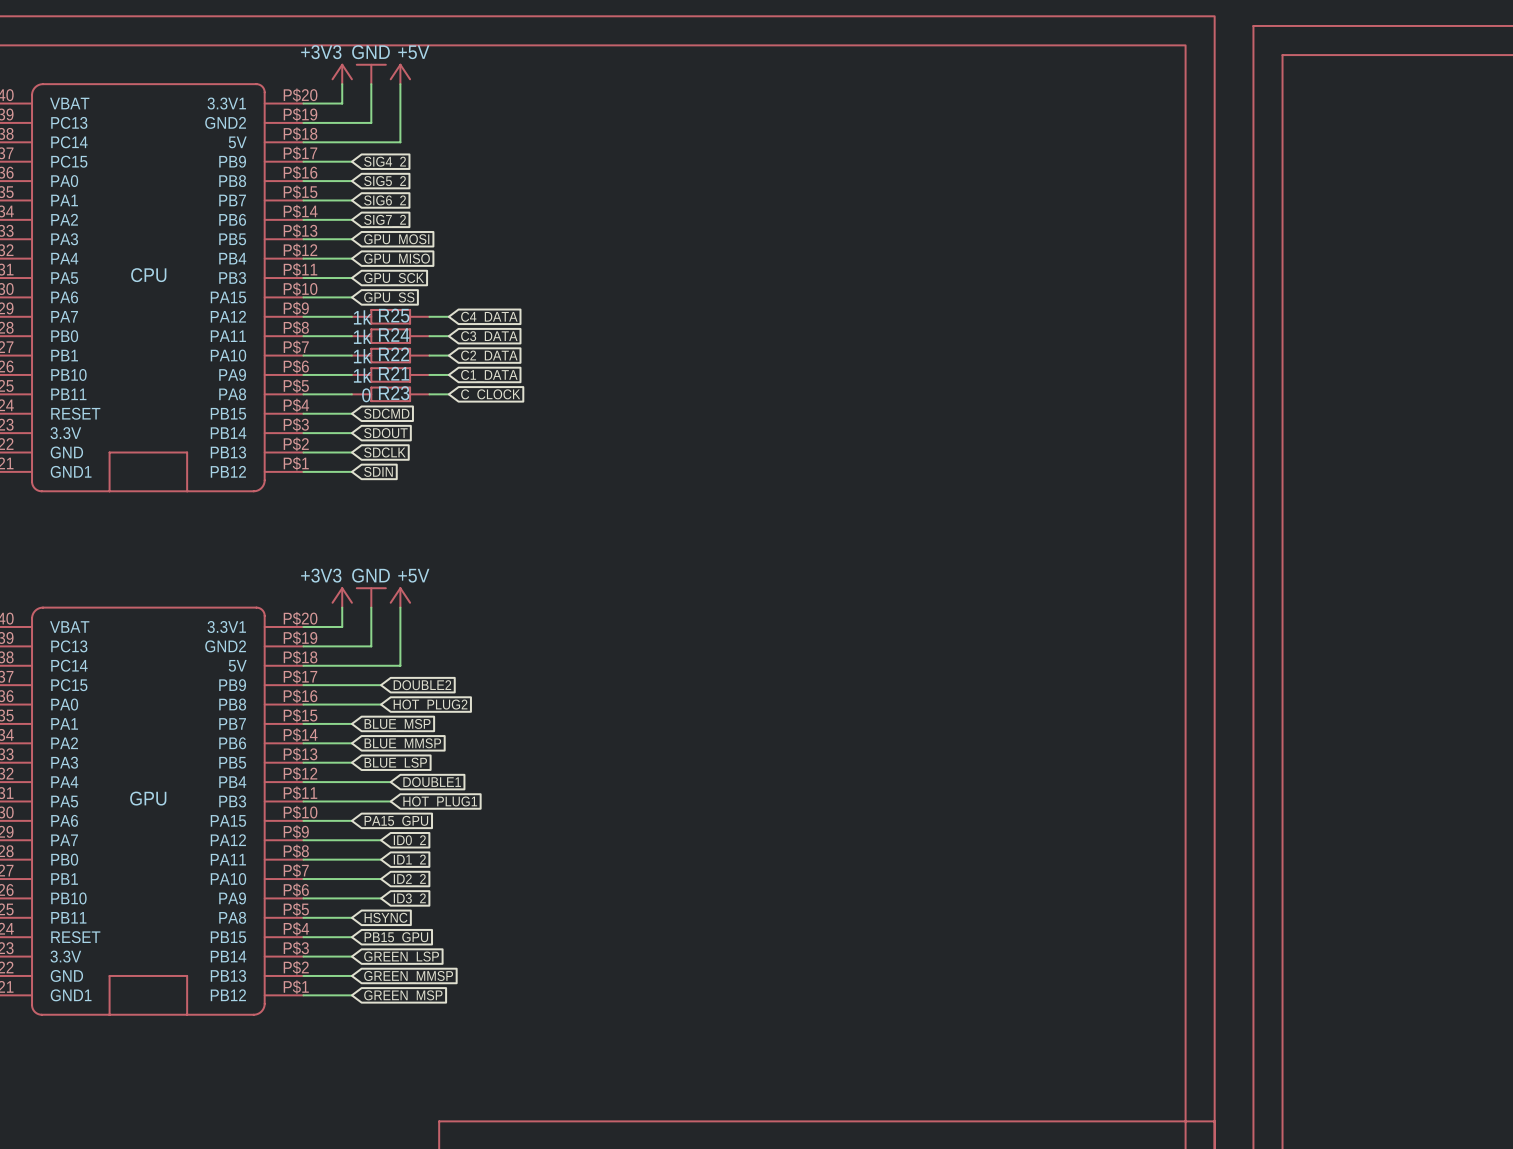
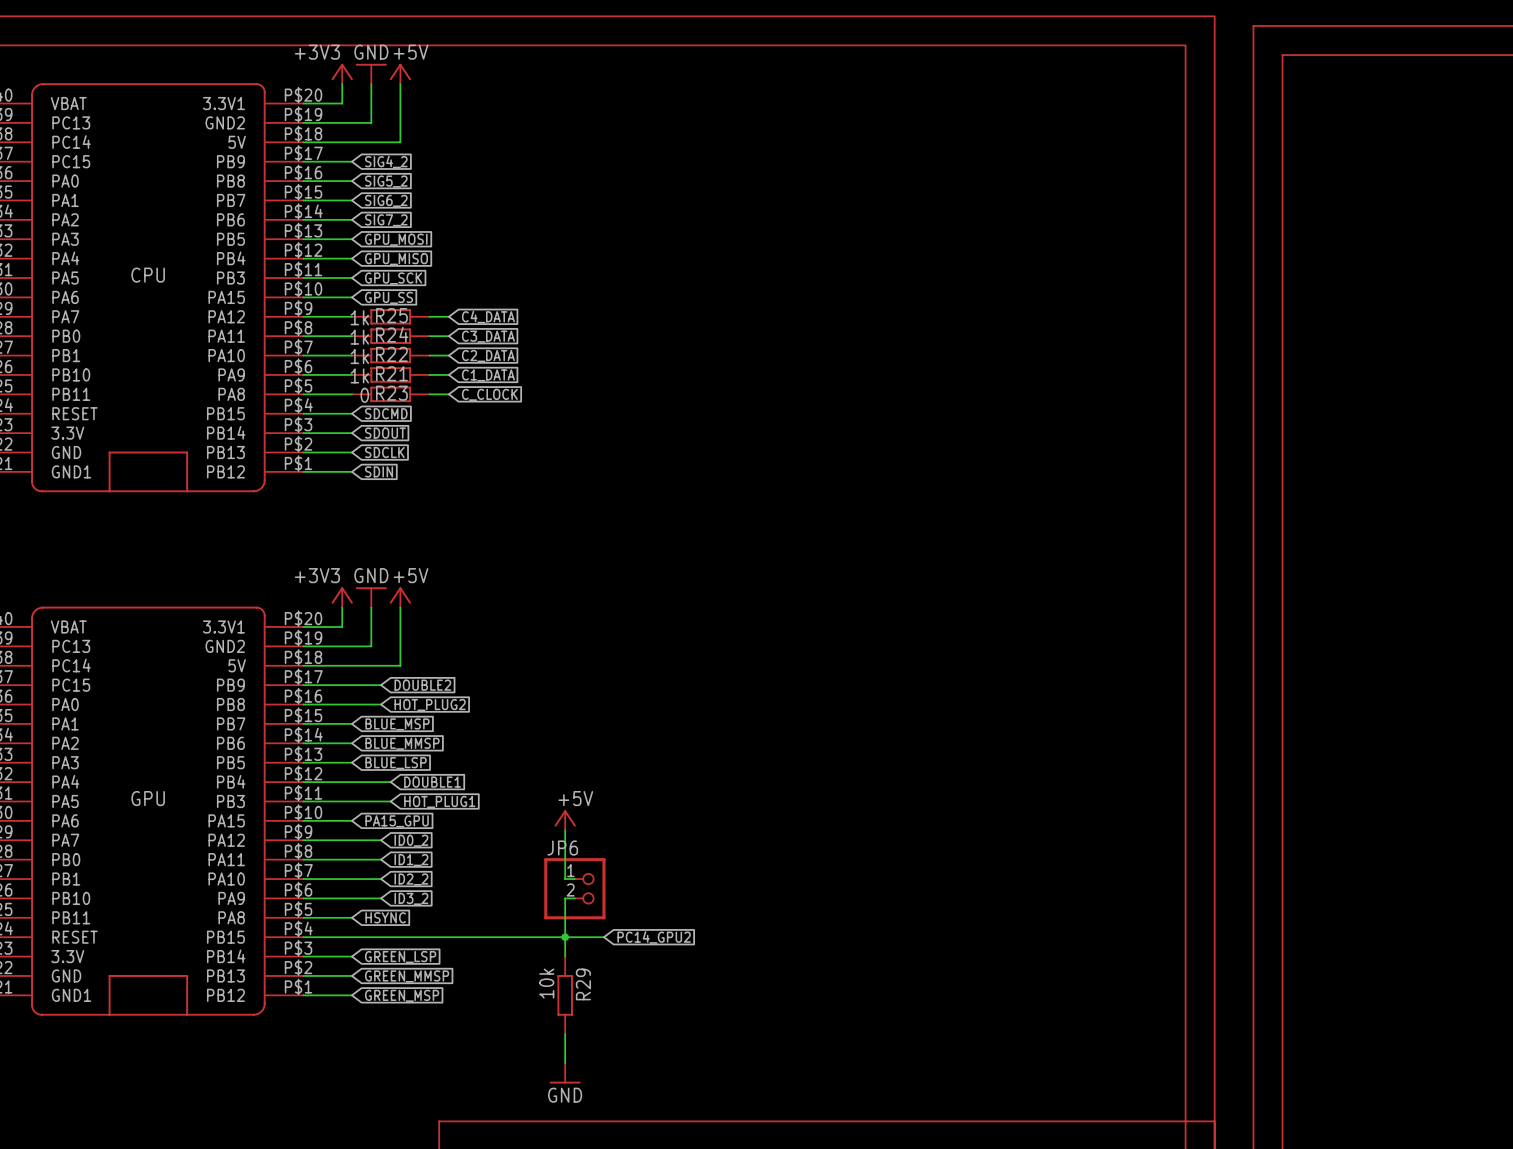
power symbol: none -> +5V (565, 820)
wire: none -> (565, 830) (565, 879) (574, 879)
JP6: none -> (574, 888)
wire: none -> (574, 898) (565, 898) (565, 956)
wire: none -> (351, 937) (603, 937)
junction: none -> (565, 937)
global label: PB15_GPU (396, 938) -> none
global label: none -> PC14_GPU2 (654, 937)
R29: none -> 10k (565, 995)
wire: none -> (565, 1034) (565, 1063)
power symbol: none -> GND (565, 1073)

